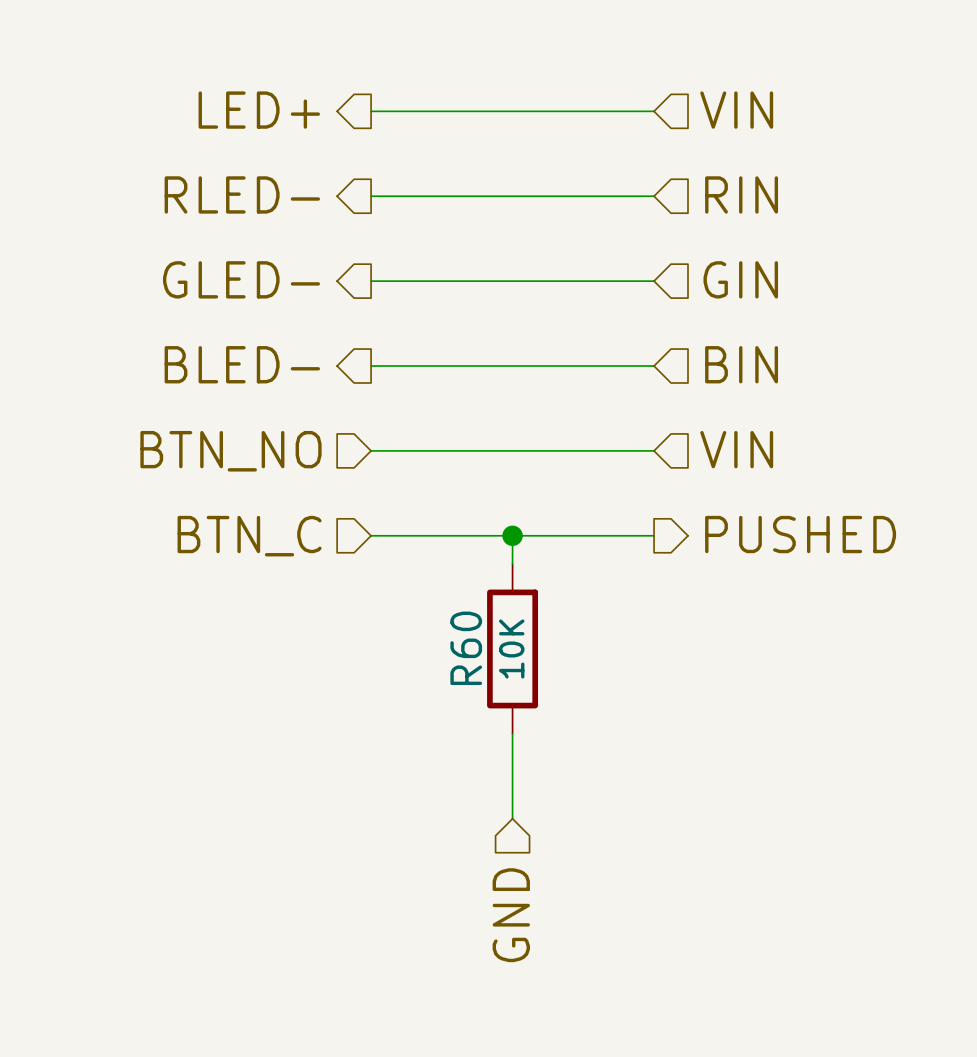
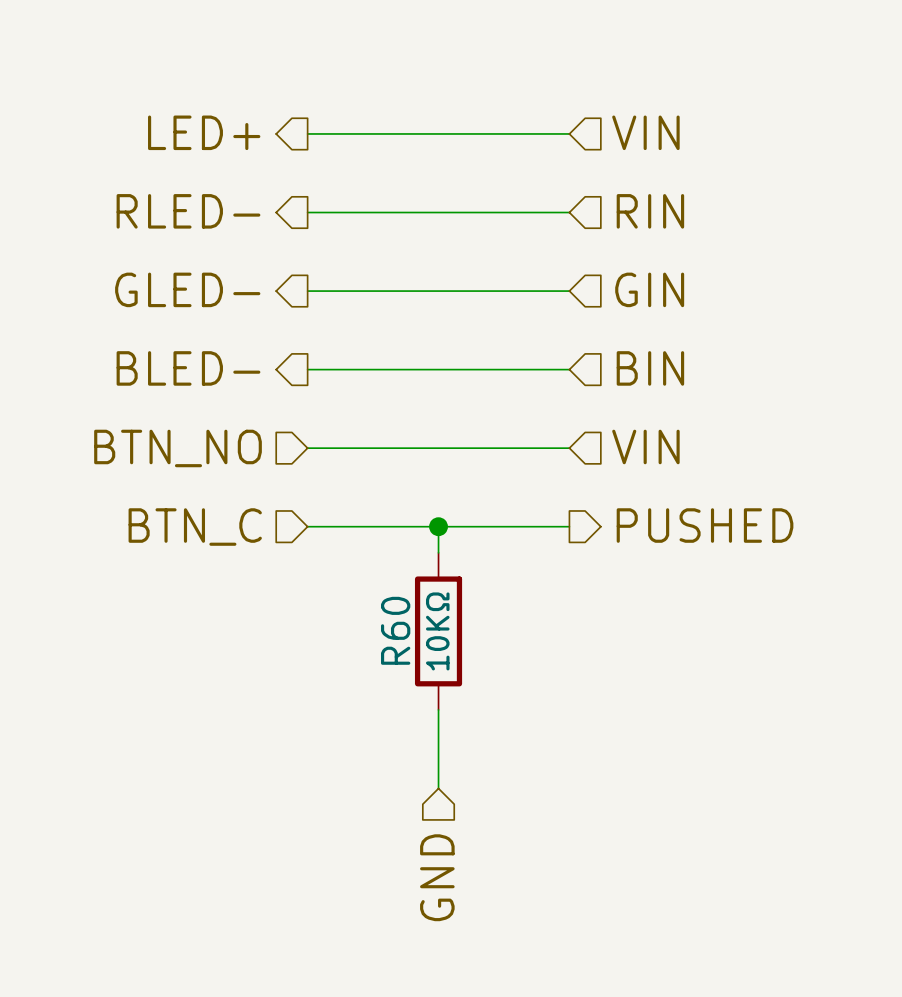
R60 value: 10K (511, 648) -> 10KΩ (437, 631)

